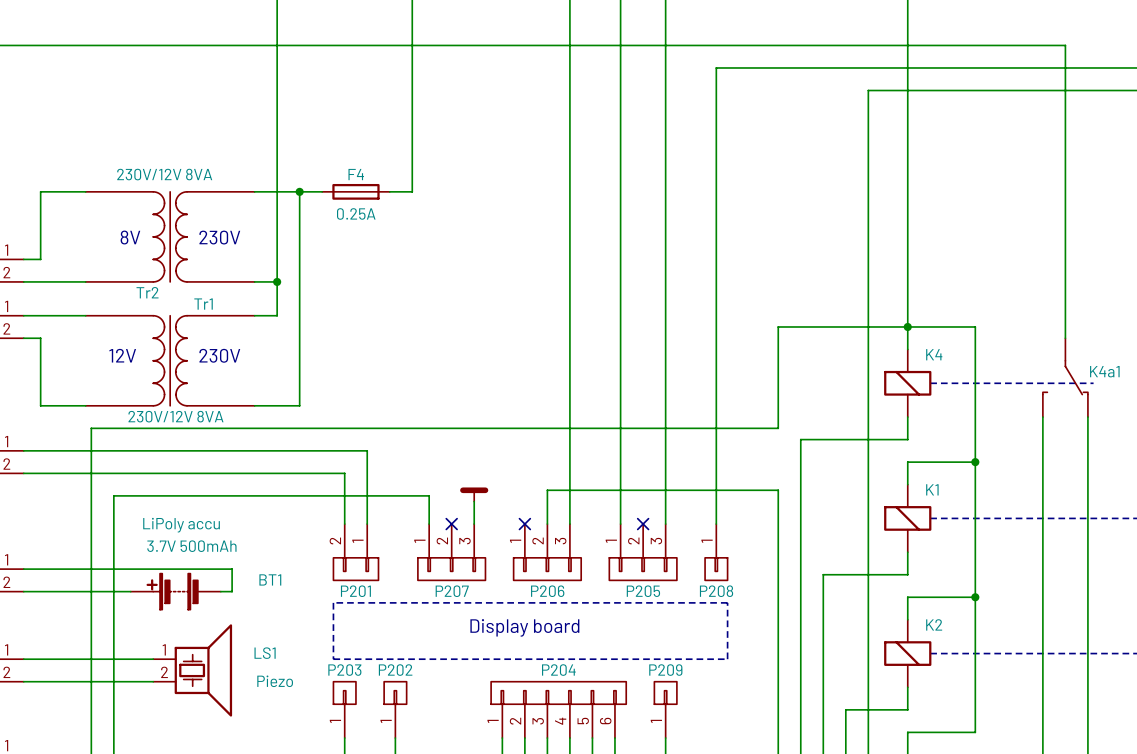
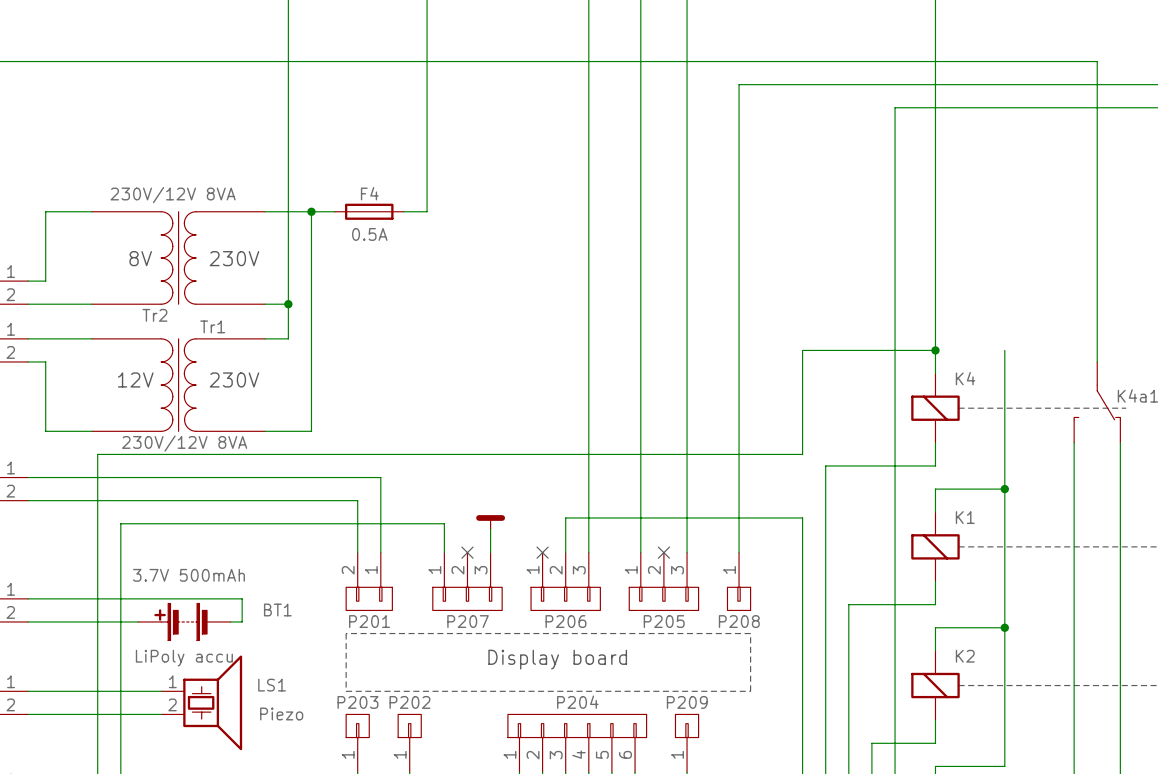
F4 value: 0.25A (356, 213) -> 0.5A (369, 234)
wire: (907, 326) (975, 326) -> none
BT1 text position: LiPoly accu (181, 525) -> LiPoly accu (184, 658)

